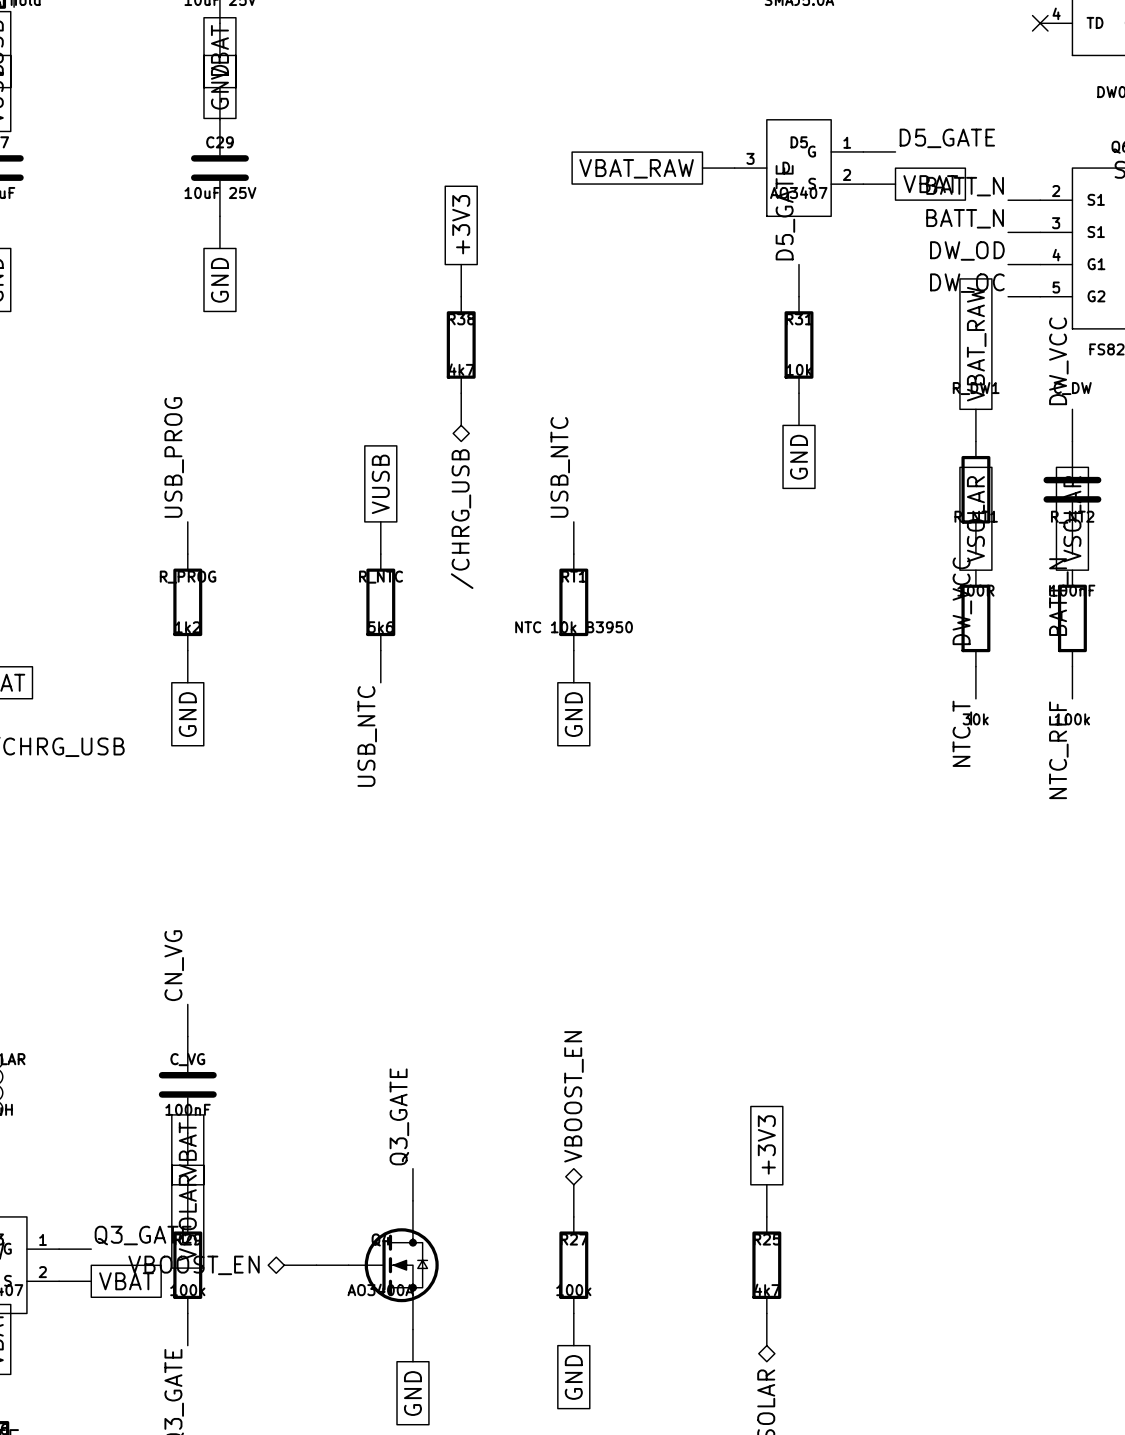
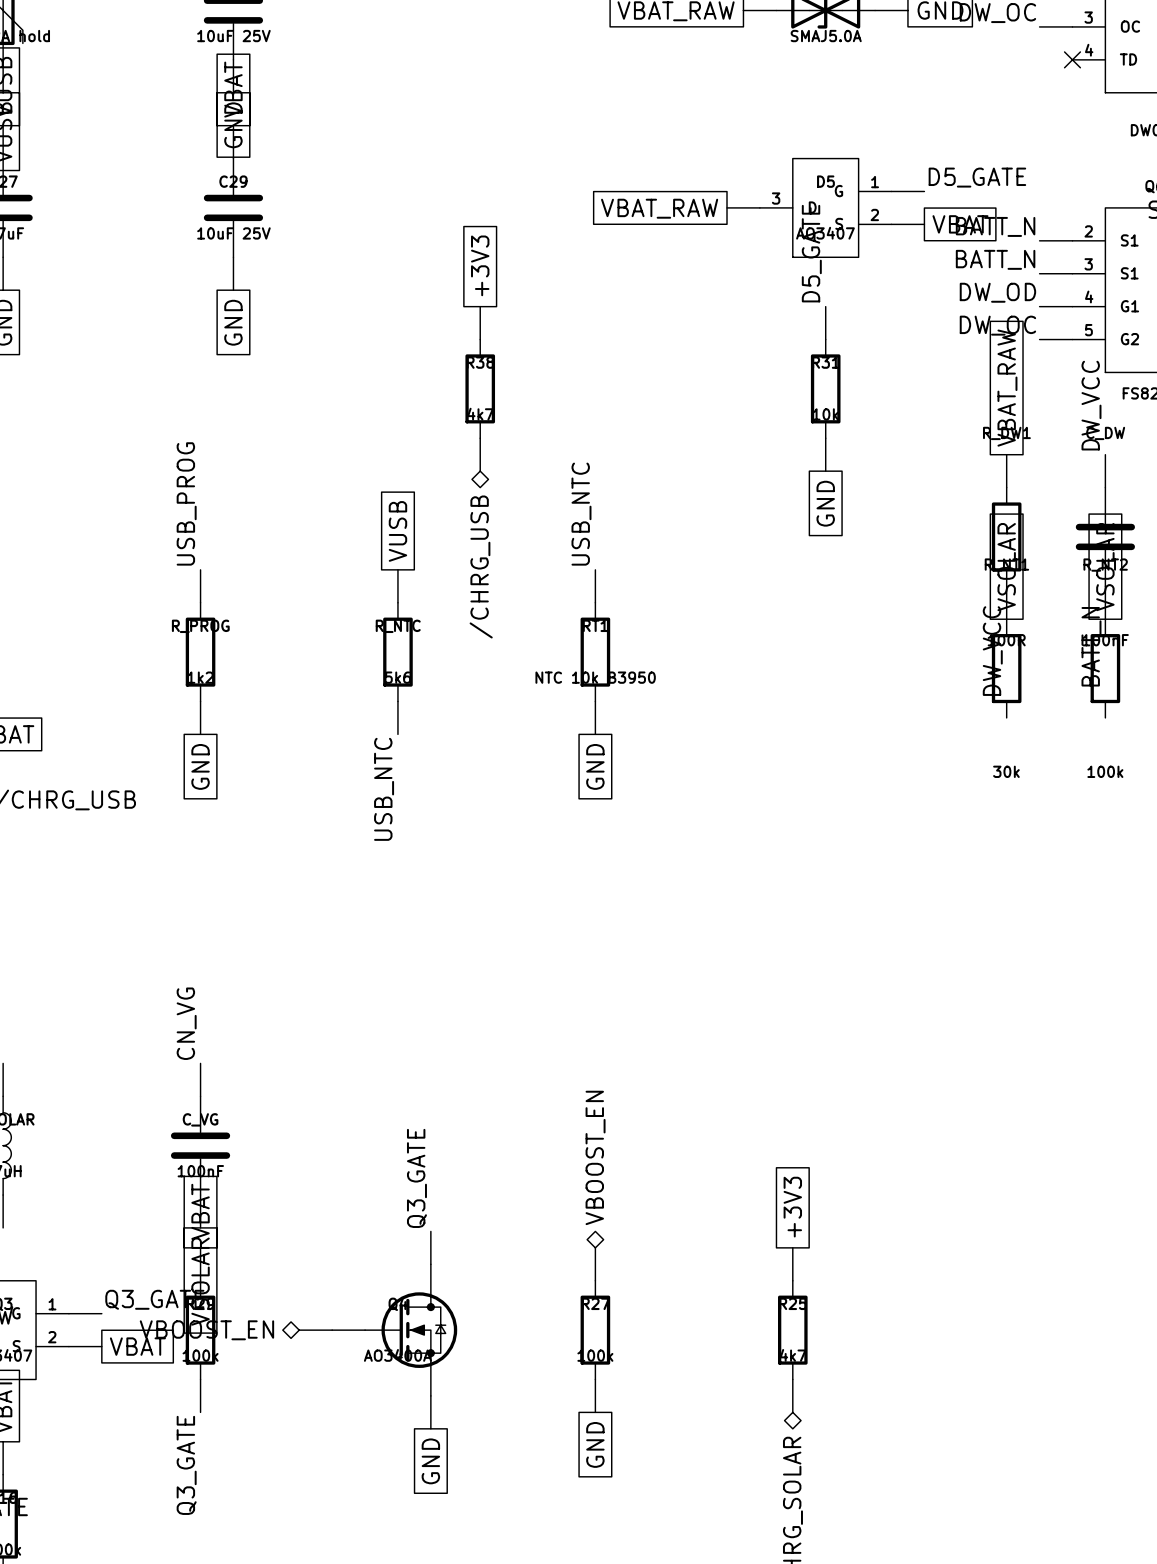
wire: none -> (1006, 602) (1006, 619)
wire: none -> (1105, 602) (1105, 619)
wire: (975, 666) (975, 698) -> none
wire: (1072, 666) (1072, 698) -> none
label: NTC_T (962, 733) -> none
label: NTC_REF (1058, 750) -> none

